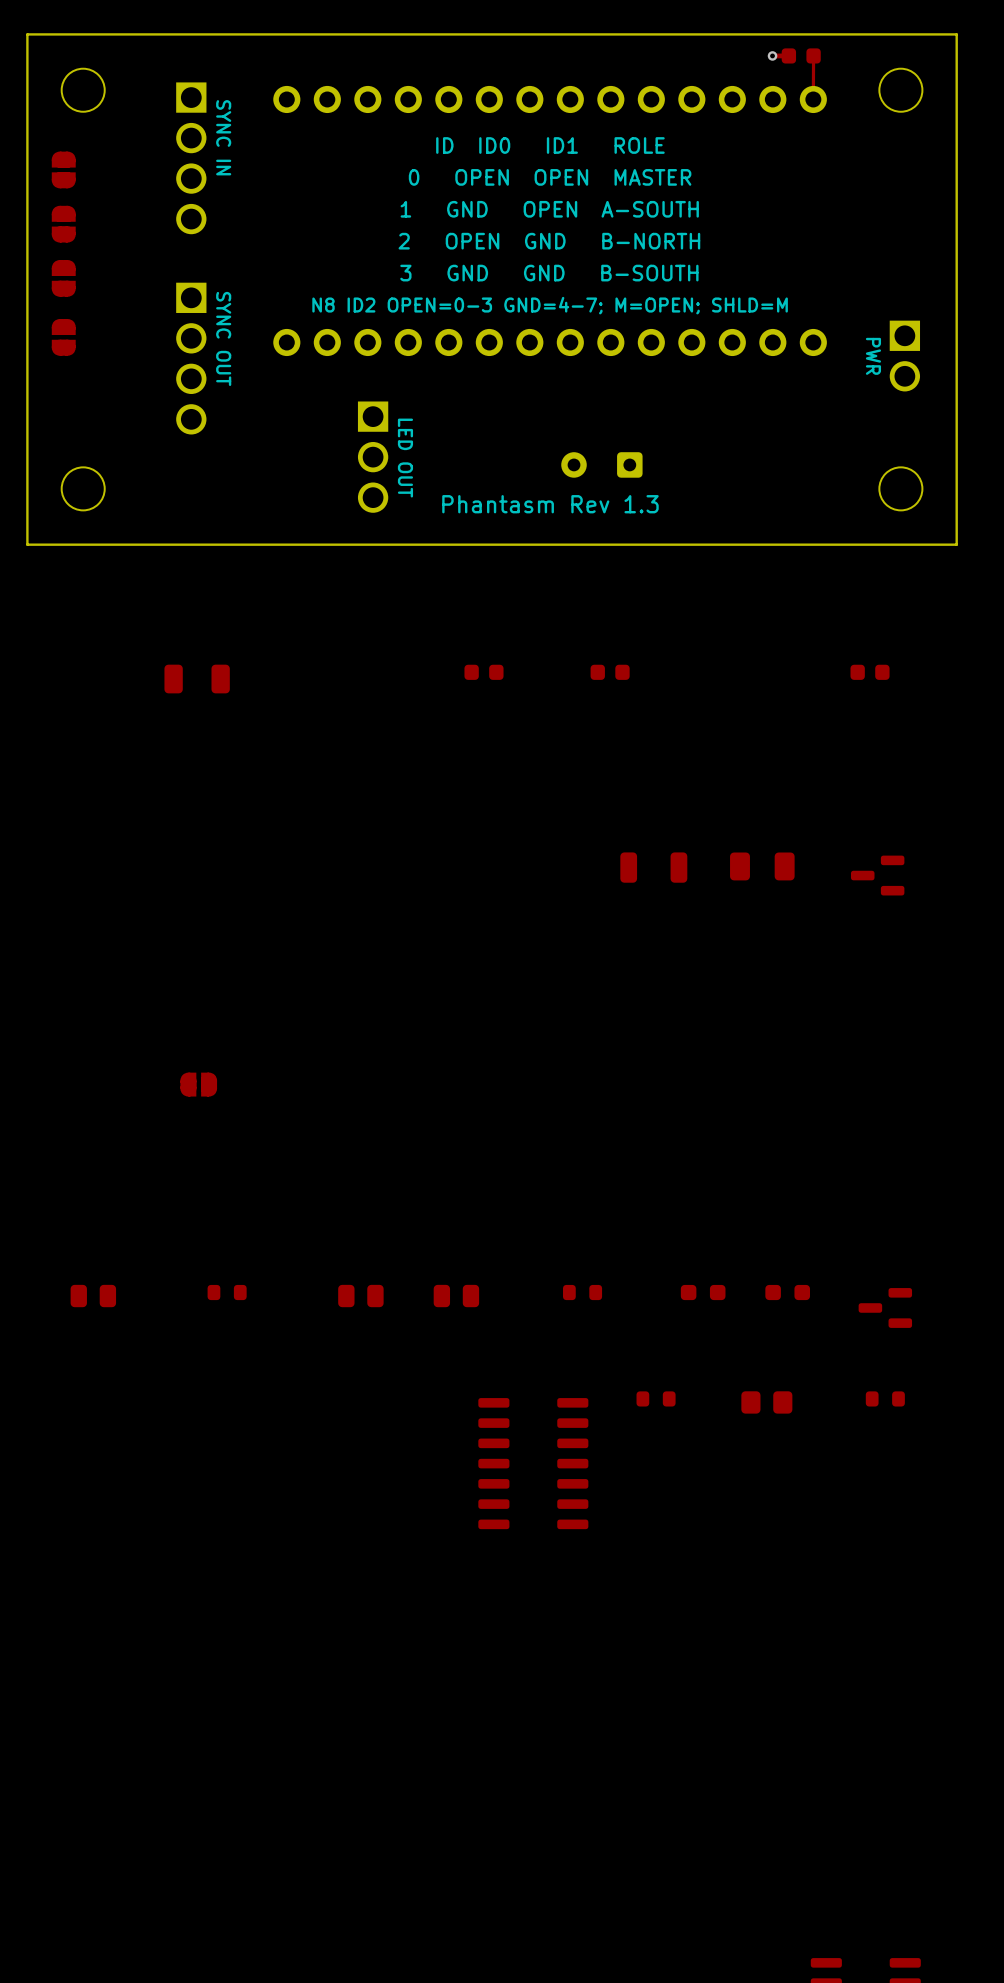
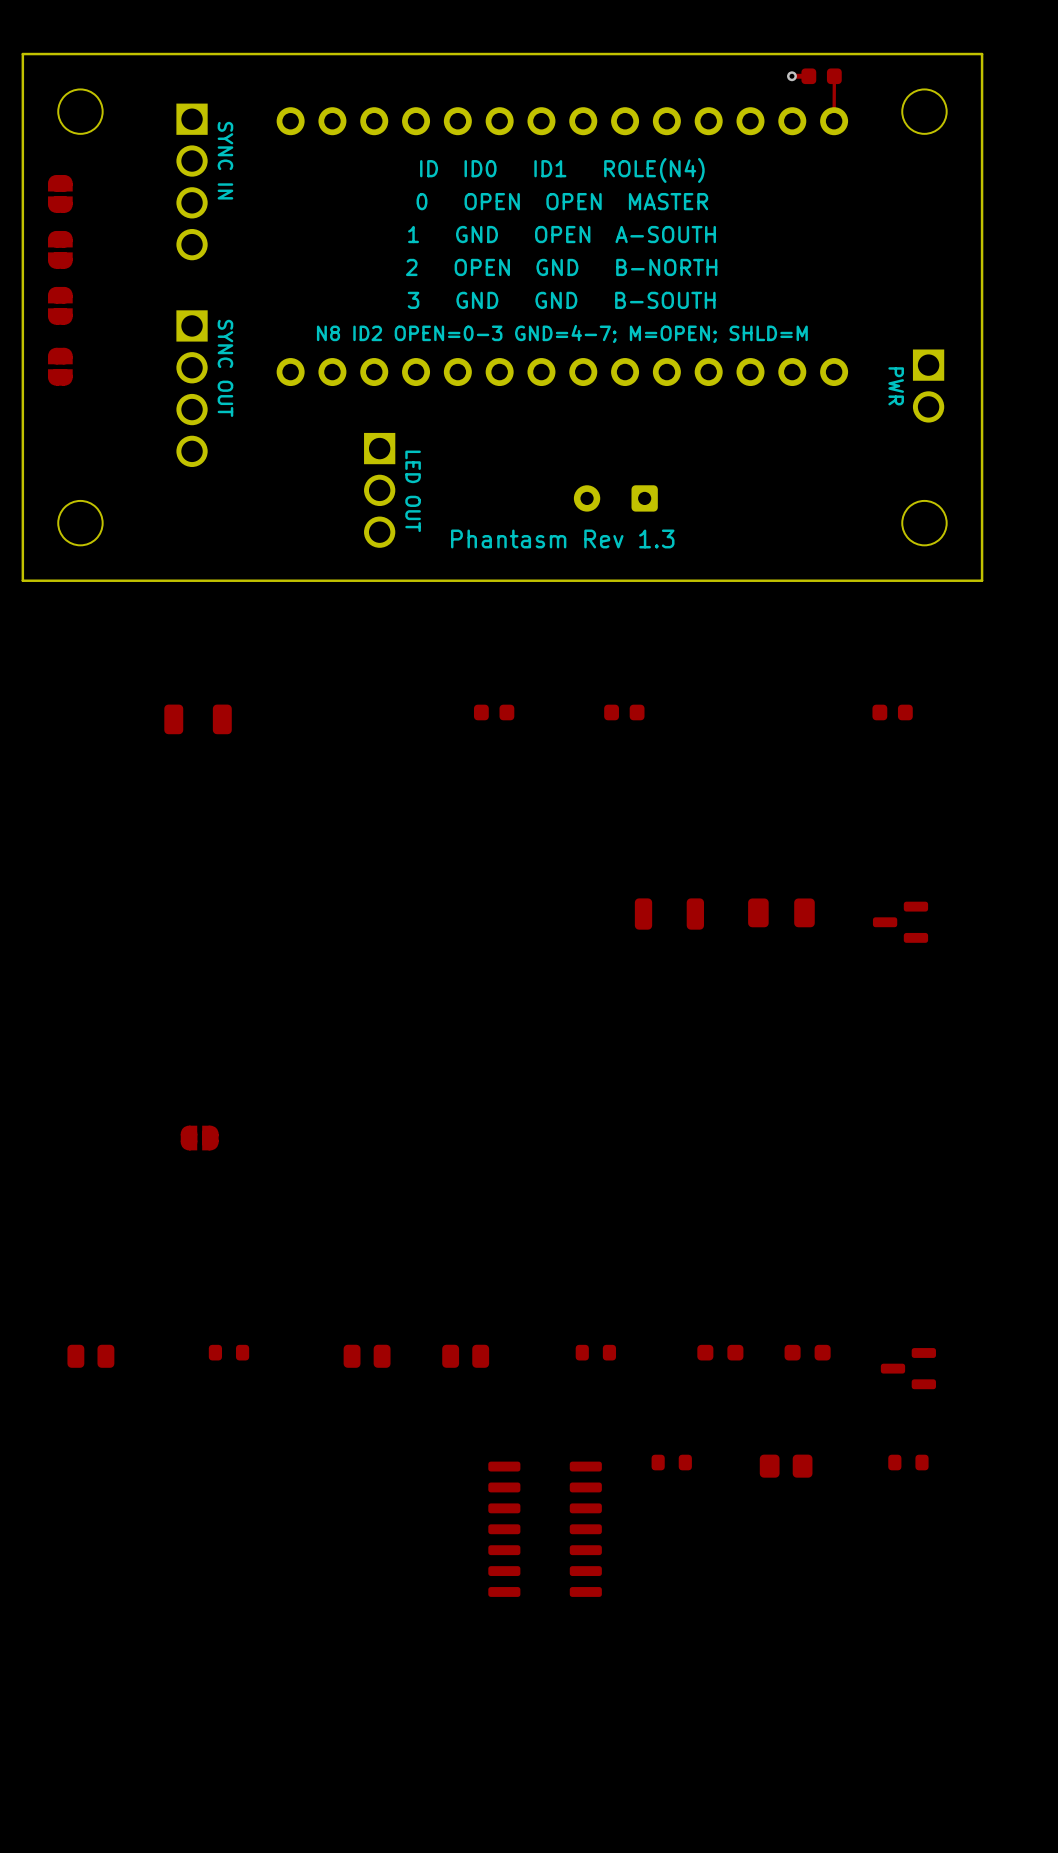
text: ID ID0 ID1 ROLE (550, 145) -> ID ID0 ID1 ROLE(N4) (562, 170)

